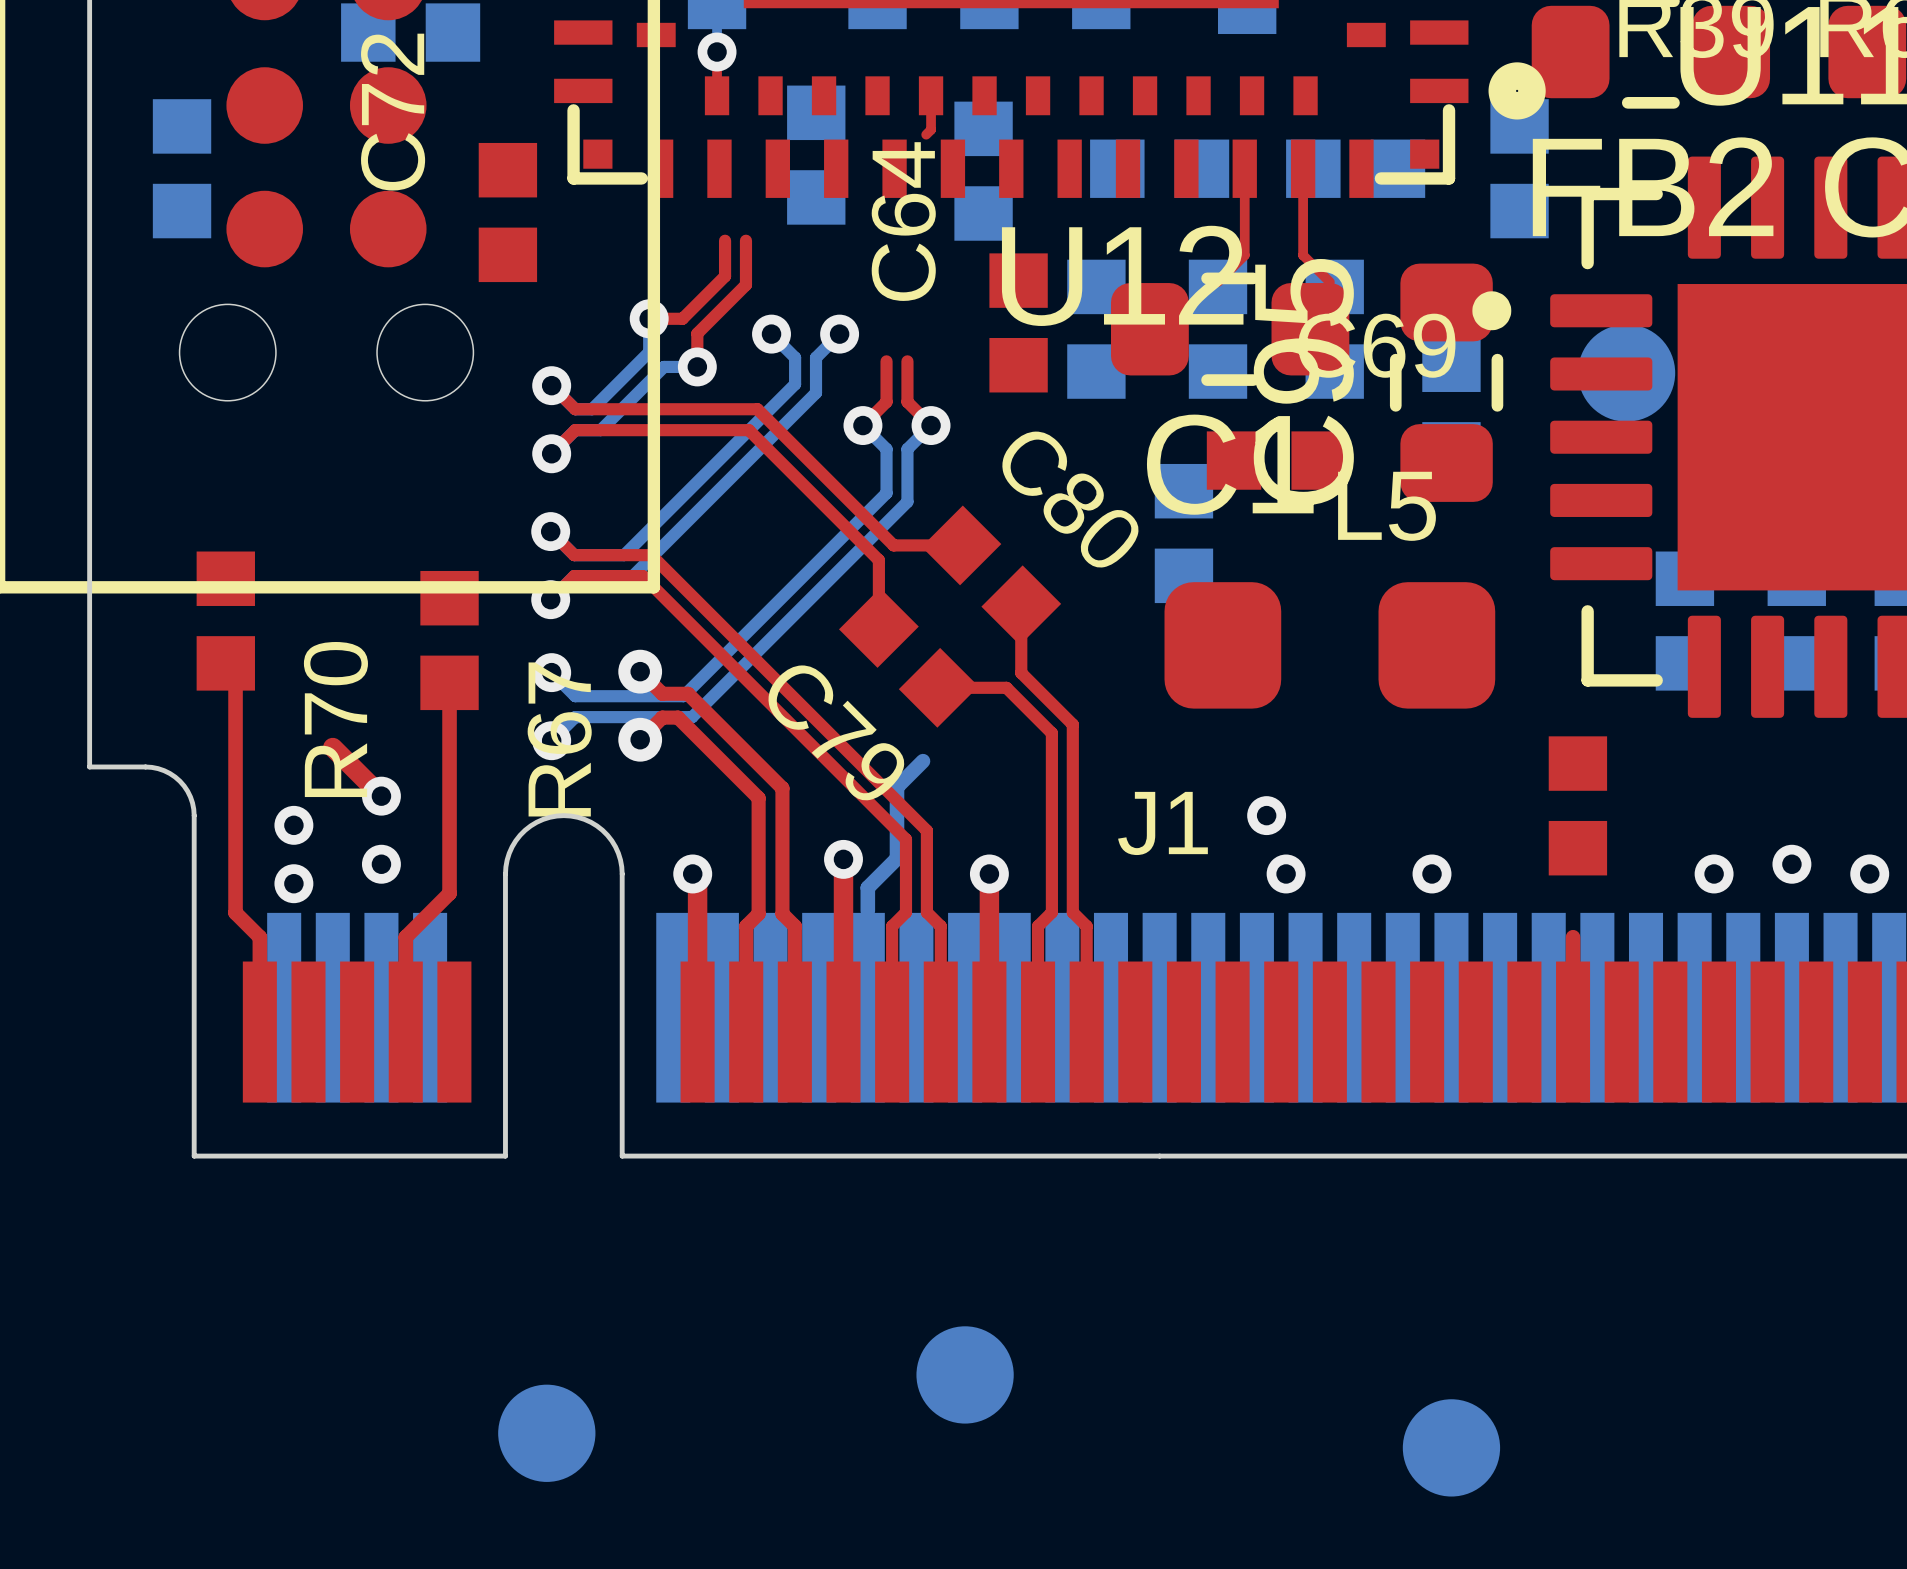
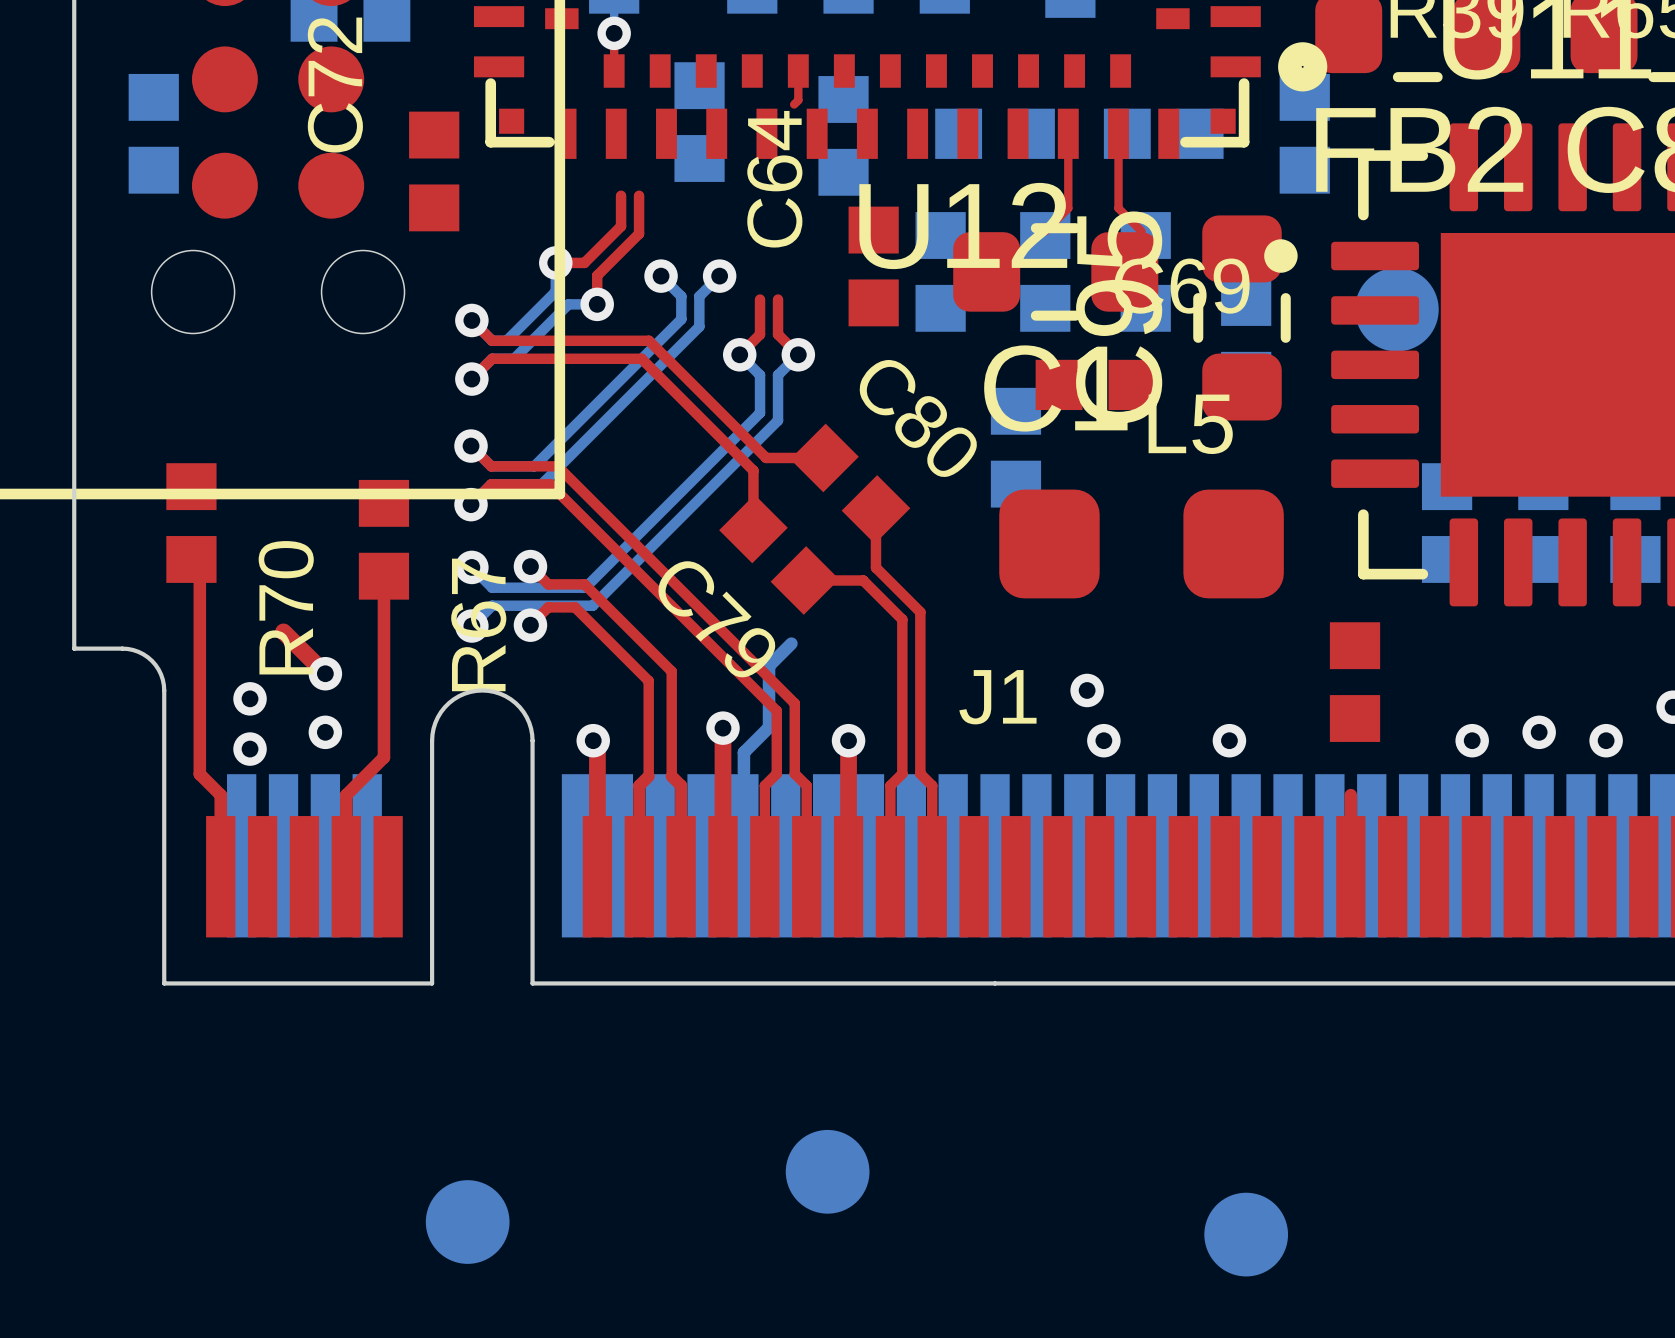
top track: (640, 671) (662, 693) (687, 693) (782, 788) (783, 915) -> (530, 566) (548, 584) (584, 584) (671, 671) (671, 776)
via position: (640, 671) -> (530, 566)
top track: (640, 739) (662, 717) (678, 717) (758, 798) (757, 915) -> (530, 625) (548, 607) (575, 607) (648, 681) (648, 776)
via position: (640, 739) -> (530, 625)

